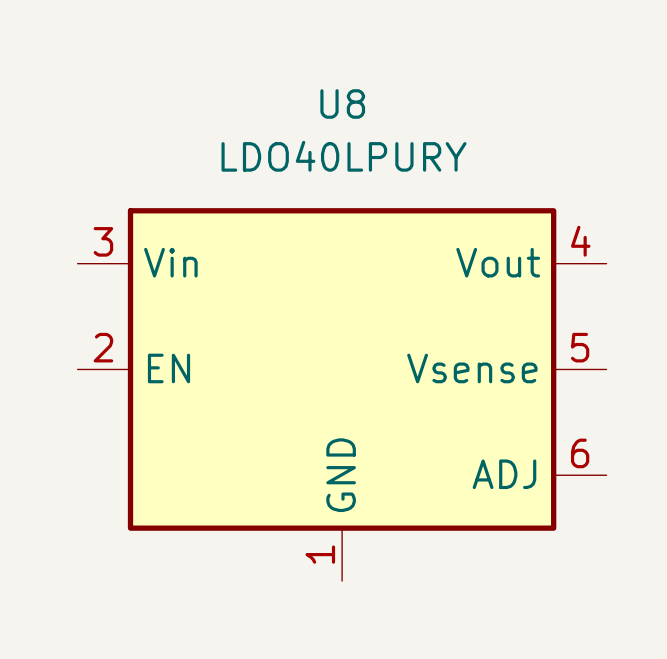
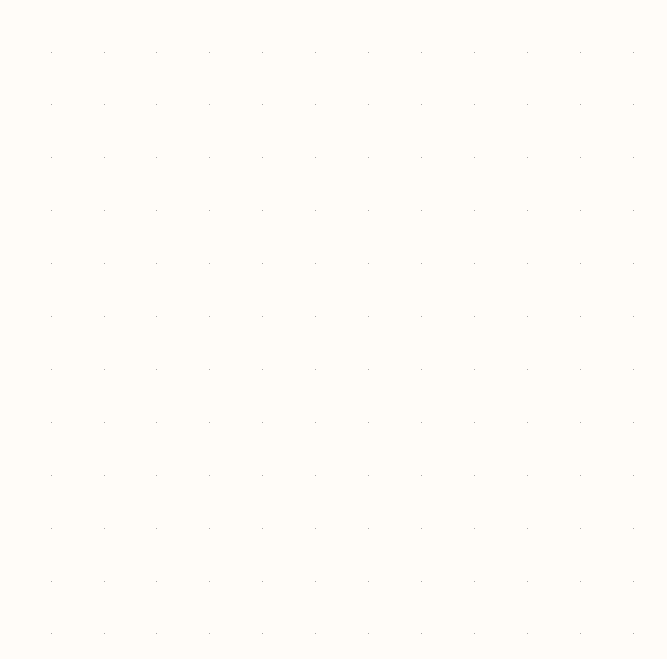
U8: LDO40LPURY (342, 394) -> none

